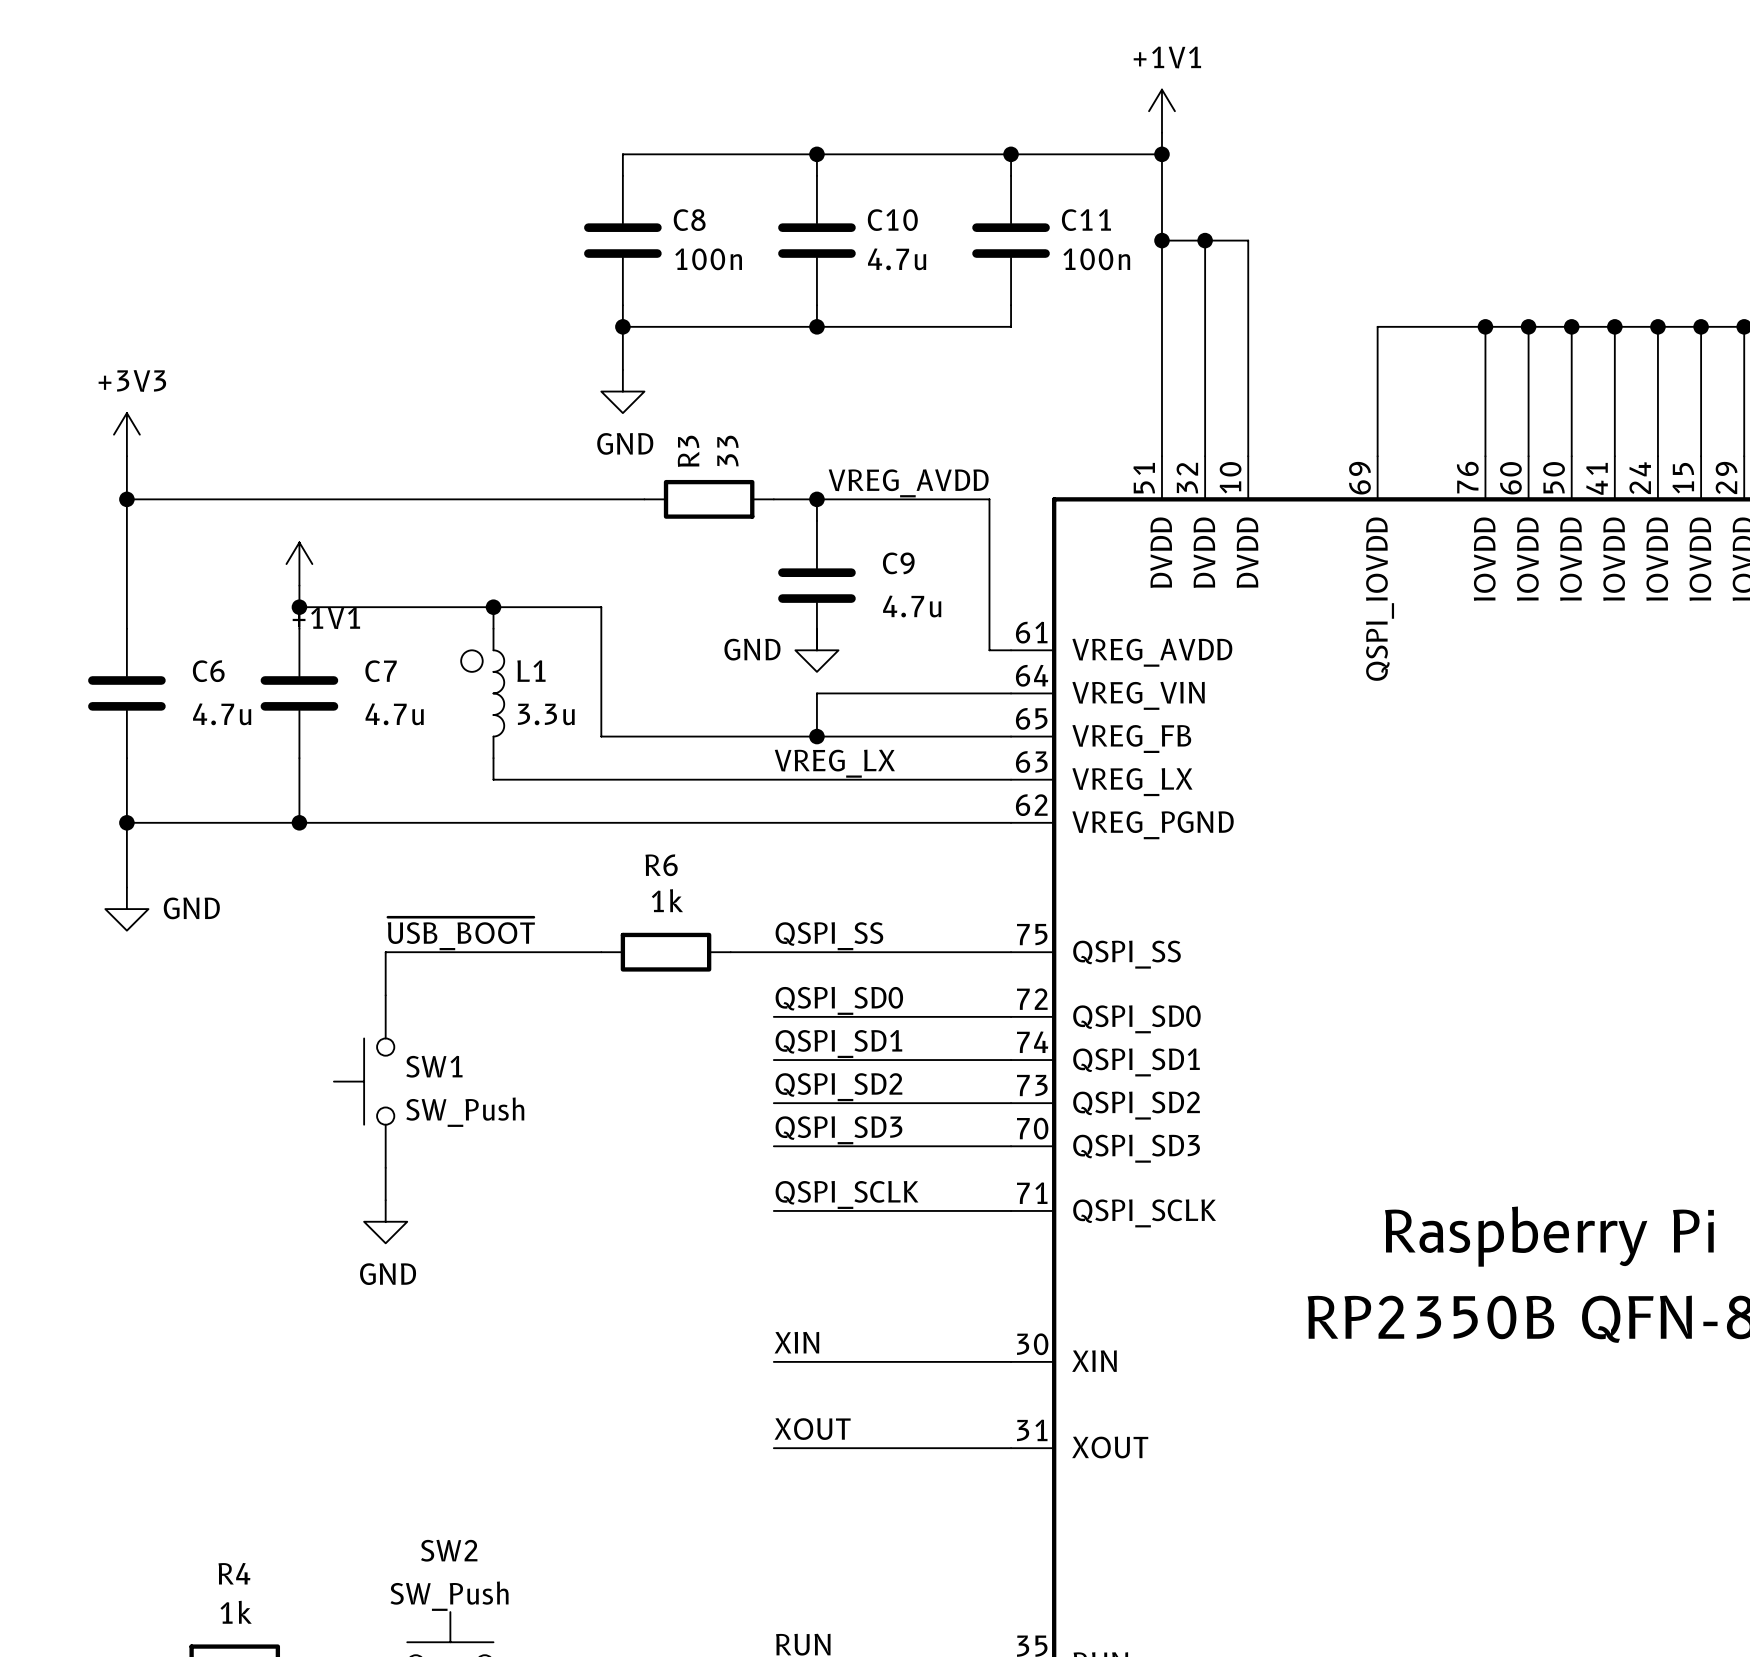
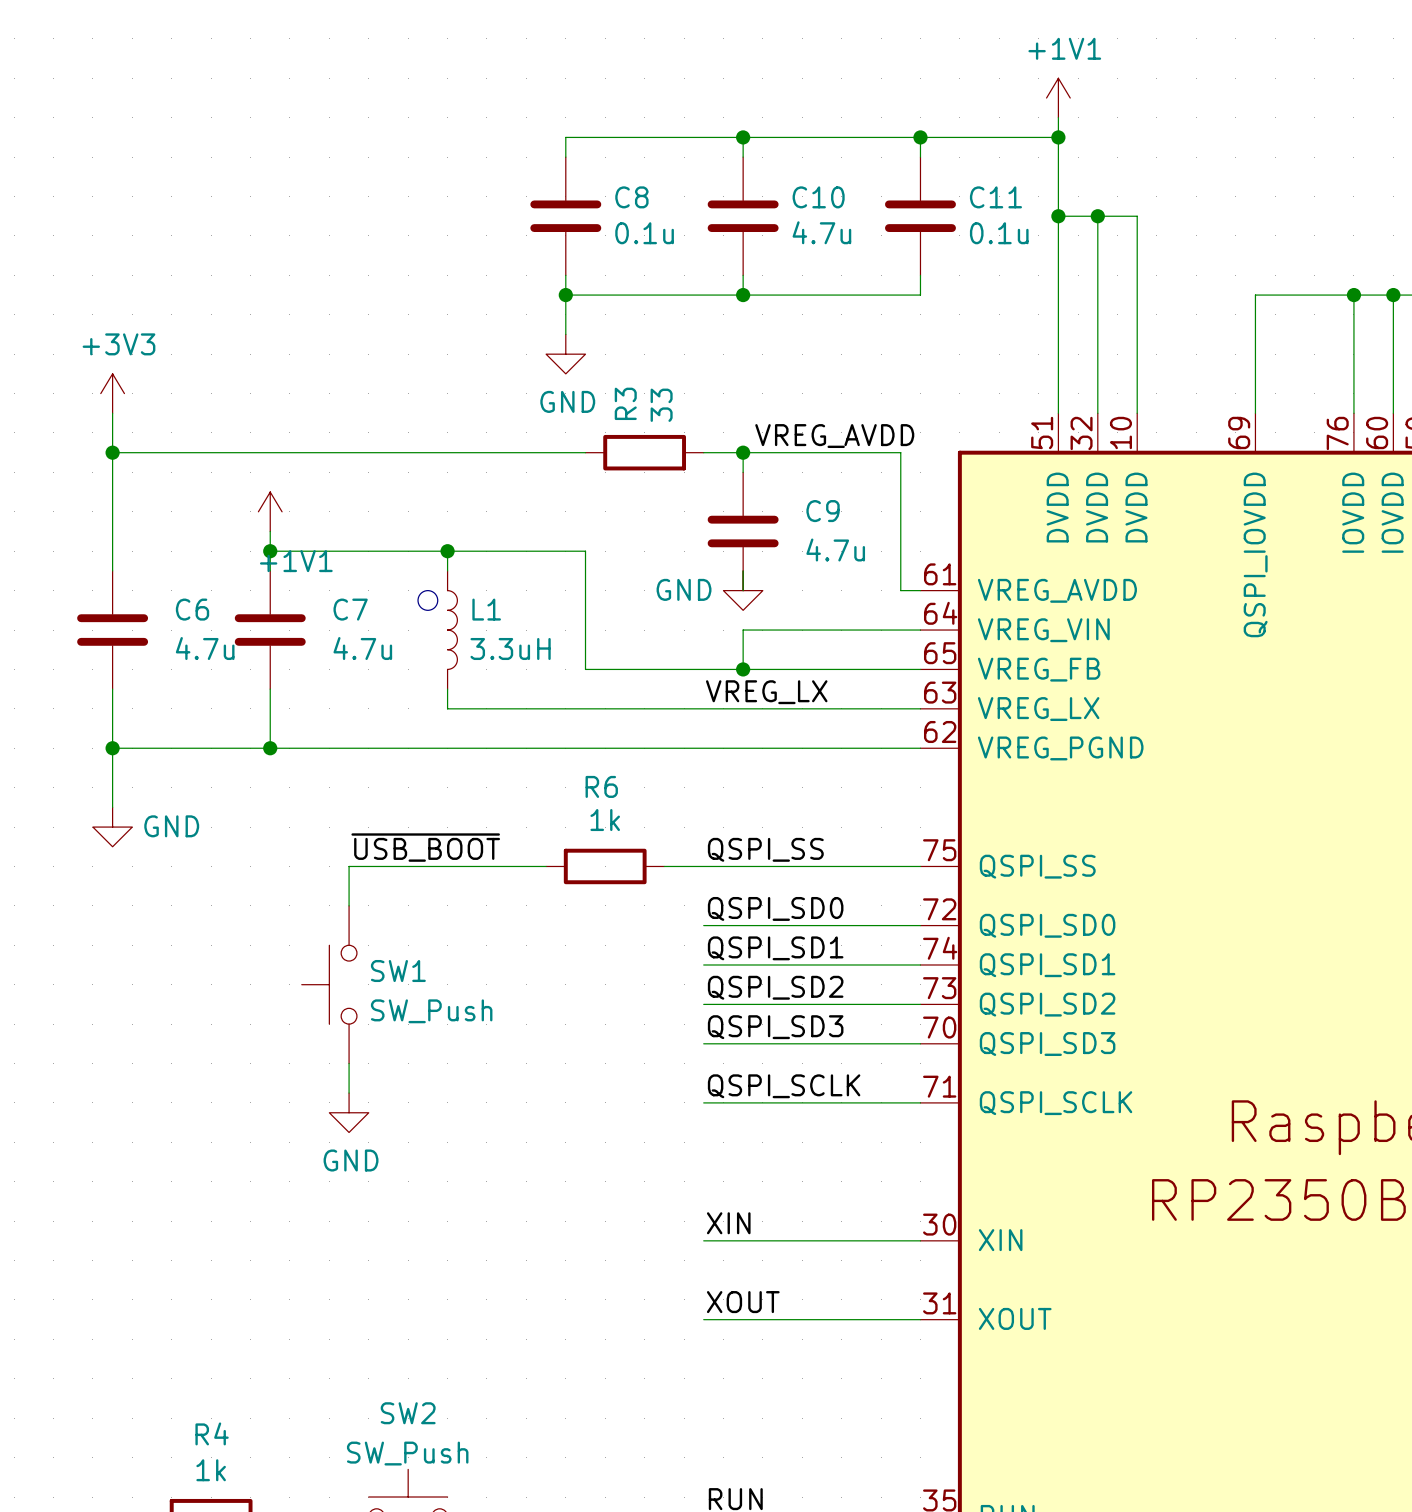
C8 value: 100n (708, 259) -> 0.1u (644, 233)
C11 value: 100n (1096, 259) -> 0.1u (999, 233)
wire: (601, 607) (601, 736) (644, 736) -> (546, 551) (585, 551) (585, 669)
L1 value: 3.3u (546, 714) -> 3.3uH (510, 648)

